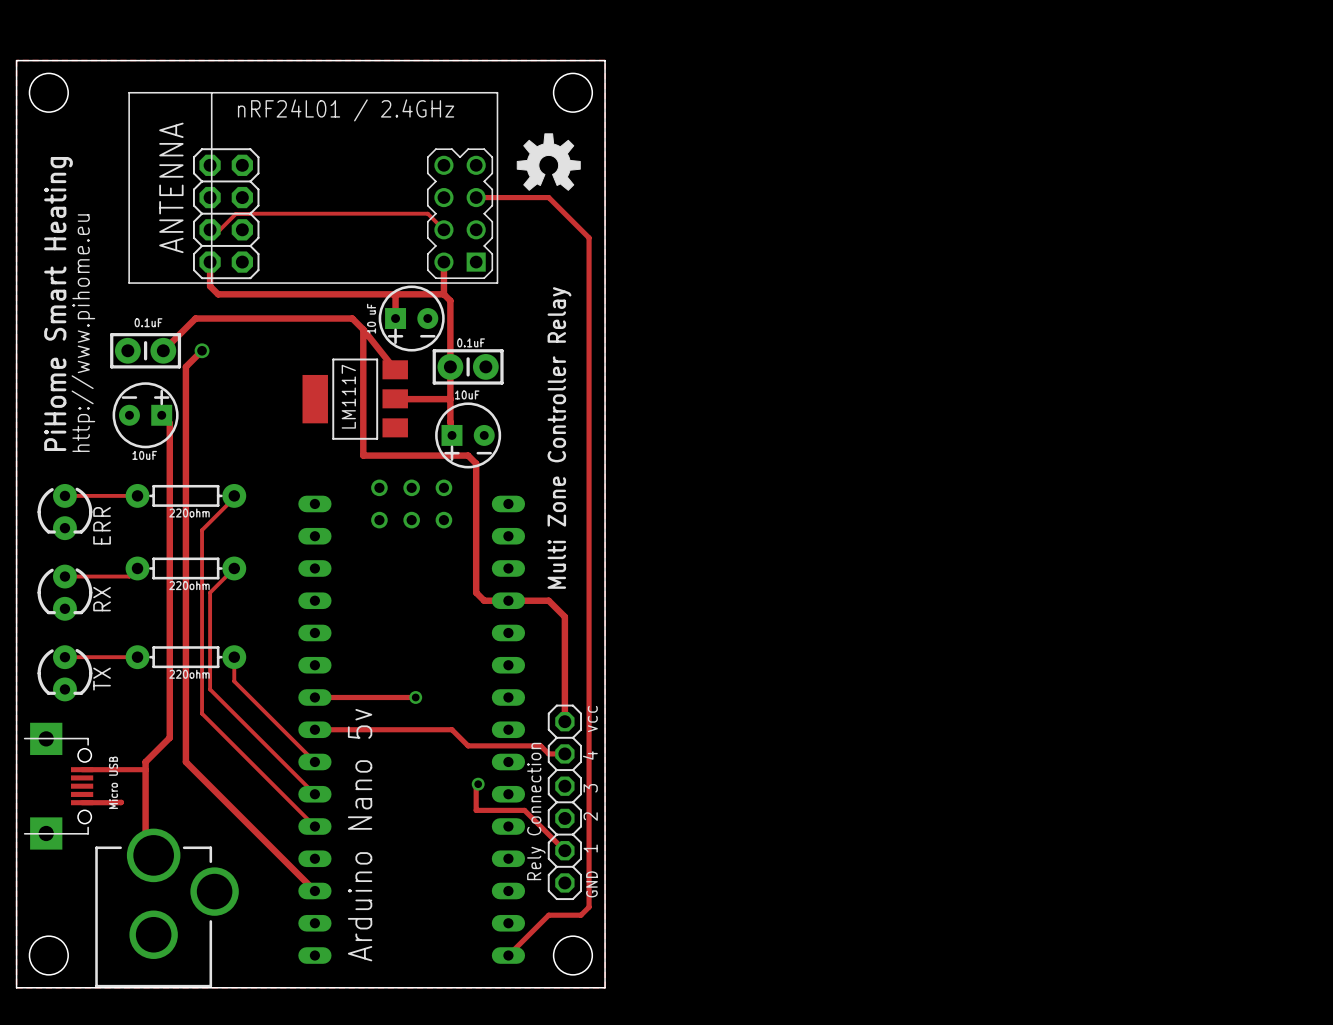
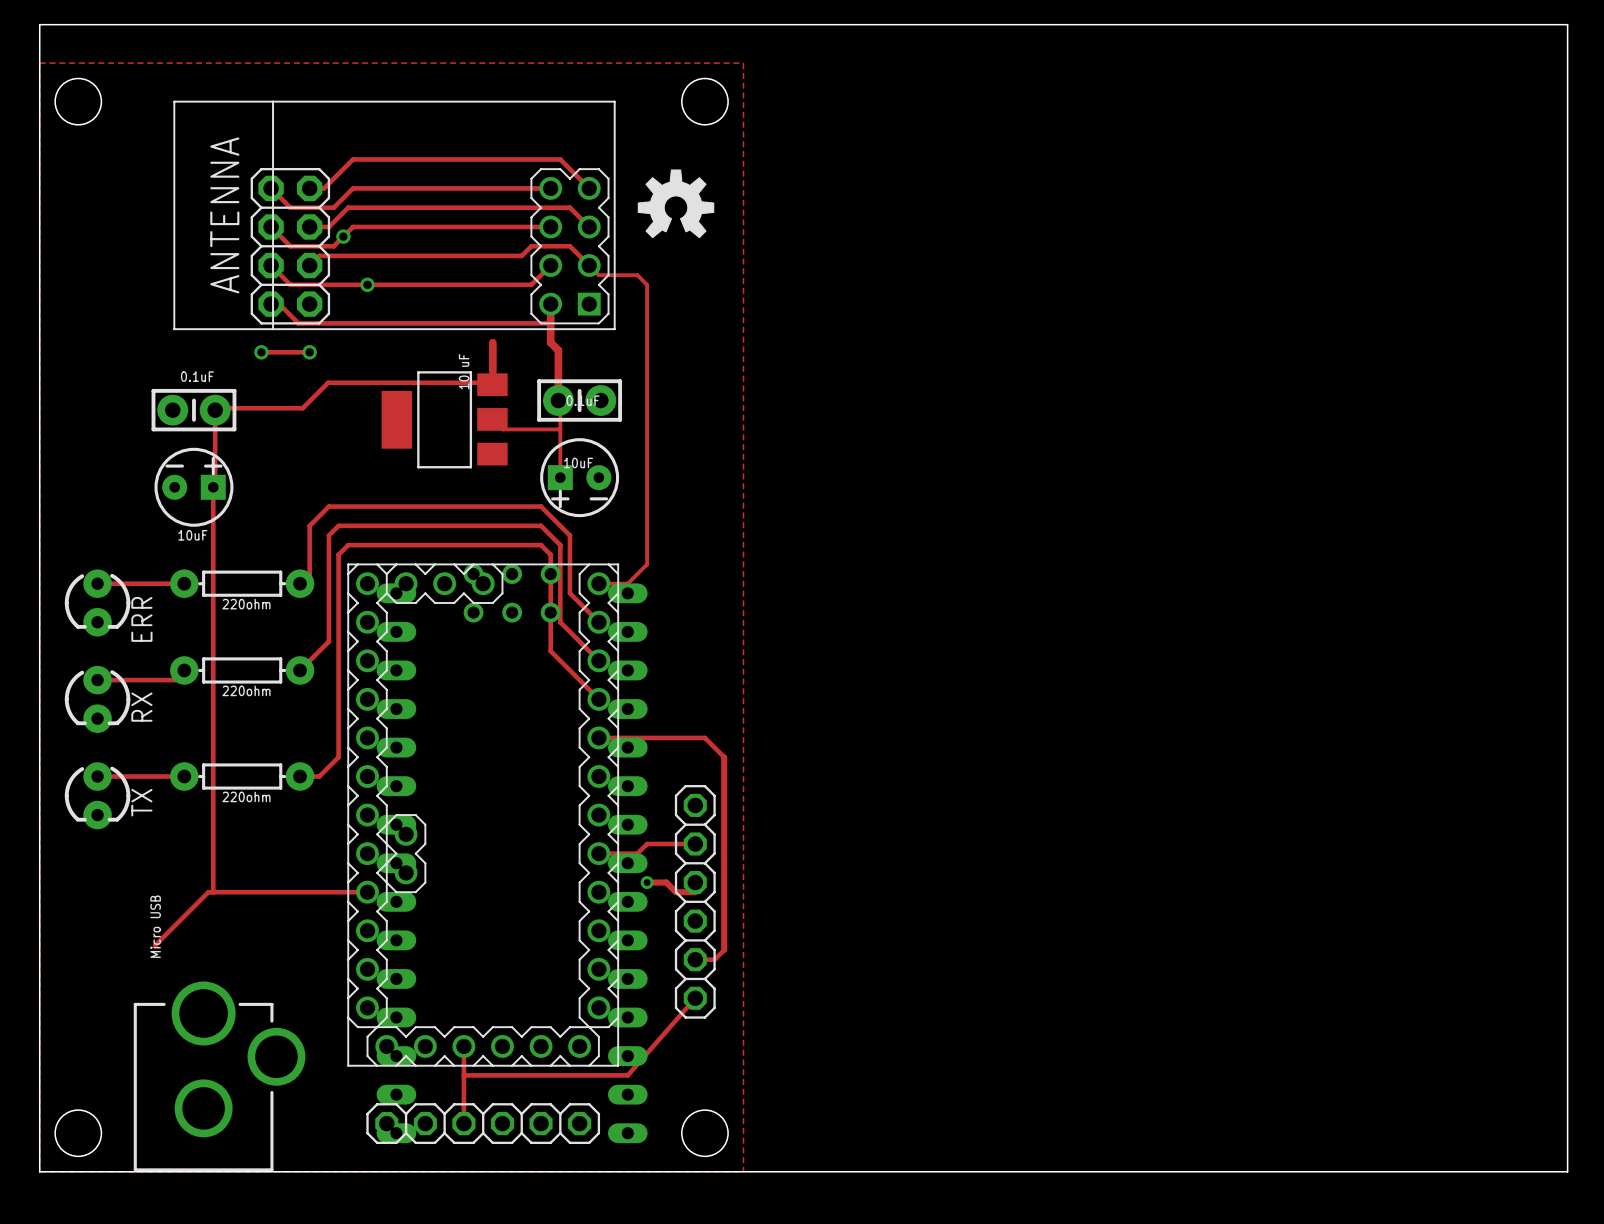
board edge: (16, 60) (605, 60) (605, 987) -> (39, 63) (39, 24) (1567, 24) (1567, 1171) (743, 1171)
text: nRF24L01 / 2.4GHz (346, 110) -> none
drawing position: (548, 162) -> (676, 203)
track: none -> (271, 188) (290, 207) (333, 207) (353, 188) (550, 188)
track: none -> (309, 188) (324, 188) (353, 159) (560, 159) (589, 188)
track: none -> (309, 226) (328, 226) (348, 207) (569, 207) (589, 226)
track: (476, 197) (548, 197) (589, 237) (589, 641) -> (598, 737) (704, 737) (724, 757)
via: none -> (343, 236)
track: (250, 213) (235, 214) (220, 229) (210, 229) -> (319, 246) (290, 246) (271, 226)
track: (262, 213) (427, 213) (443, 229) -> (333, 246) (353, 226) (550, 226)
track: none -> (271, 265) (290, 284) (531, 284) (550, 265)
track: none -> (309, 265) (319, 255) (521, 255) (531, 246) (569, 246) (589, 265)
track: none -> (589, 265) (598, 275) (637, 275) (647, 284) (647, 564) (627, 583) (598, 583) (599, 582)
via: none -> (367, 284)
track: (210, 262) (210, 286) (218, 294) (443, 294) -> (271, 304) (273, 306) (281, 306) (298, 323) (550, 323)
track: none -> (261, 352) (309, 352)
via: none -> (261, 352)
via: none -> (309, 352)
text: PiHome Smart Heating (58, 303) -> none
part: (411, 318) -> none
track: (363, 329) (363, 455) (468, 455) (476, 463) (476, 592) (484, 600) (548, 600) (564, 616) (564, 721) -> none
track: (363, 329) (352, 318) (195, 318) (163, 350) -> none
track: (363, 329) (395, 369) -> none
track: none -> (492, 384) (489, 382) (328, 382) (302, 408) (217, 408) (215, 410) (215, 485) (213, 487) (213, 892)
text: http://www.pihome.eu (83, 333) -> none
track: (450, 342) (451, 435) -> (558, 400) (560, 402) (560, 477)
track: (202, 350) (185, 366) (185, 762) (314, 891) (282, 858) -> none
via: (202, 350) -> none
track: none -> (492, 419) (502, 429) (560, 429)
part position: (468, 366) -> (579, 400)
text: LM1117 (348, 396) -> none
track: (395, 398) (450, 399) -> none
part position: (355, 399) -> (444, 419)
track: (161, 415) (169, 423) (169, 737) (145, 762) (145, 847) (153, 855) -> none
part position: (468, 435) -> (579, 477)
text: Multi Zone Controller Relay (559, 437) -> none
track: (234, 495) (202, 530) (202, 713) (314, 826) -> (300, 583) (309, 574) (309, 525) (328, 506) (541, 506) (569, 535) (569, 593) (598, 622)
track: (234, 568) (210, 592) (210, 689) (314, 794) -> (300, 670) (328, 641) (328, 535) (338, 525) (541, 525) (560, 545) (560, 622) (598, 660)
track: (234, 657) (234, 681) (314, 762) -> (300, 776) (319, 776) (338, 757) (338, 554) (348, 545) (541, 545) (550, 554) (550, 651) (598, 699)
part: none -> (483, 815)
track: (314, 697) (415, 697) -> none
via: (415, 697) -> none
track: none -> (695, 843) (647, 843) (637, 853) (598, 853)
text: vcc (592, 719) -> none
track: (314, 729) (451, 729) (468, 745) (524, 745) -> none
via: none -> (647, 882)
track: none -> (367, 892) (208, 892) (155, 946)
text: 4 (590, 755) -> none
track: (82, 769) (145, 770) -> none
track: (478, 784) (476, 786) (476, 810) (524, 810) (564, 850) -> none
via: (478, 784) -> none
part: (58, 786) -> none
text: 3 (590, 788) -> none
track: (113, 802) (121, 802) (82, 802) -> none
part position: (564, 802) -> (695, 901)
track: (589, 802) (589, 907) (581, 915) (548, 915) (508, 955) -> (724, 950) (714, 959) (695, 959)
text: Rely Connection (536, 811) -> none
text: 2 (590, 816) -> none
text: Arduino Nano 5v (360, 835) -> none
track: none -> (695, 998) (627, 1075) (463, 1075)
text: 1 (590, 848) -> none
track: none -> (463, 1046) (463, 1123)
text: GND (591, 884) -> none
part: none -> (483, 1123)

